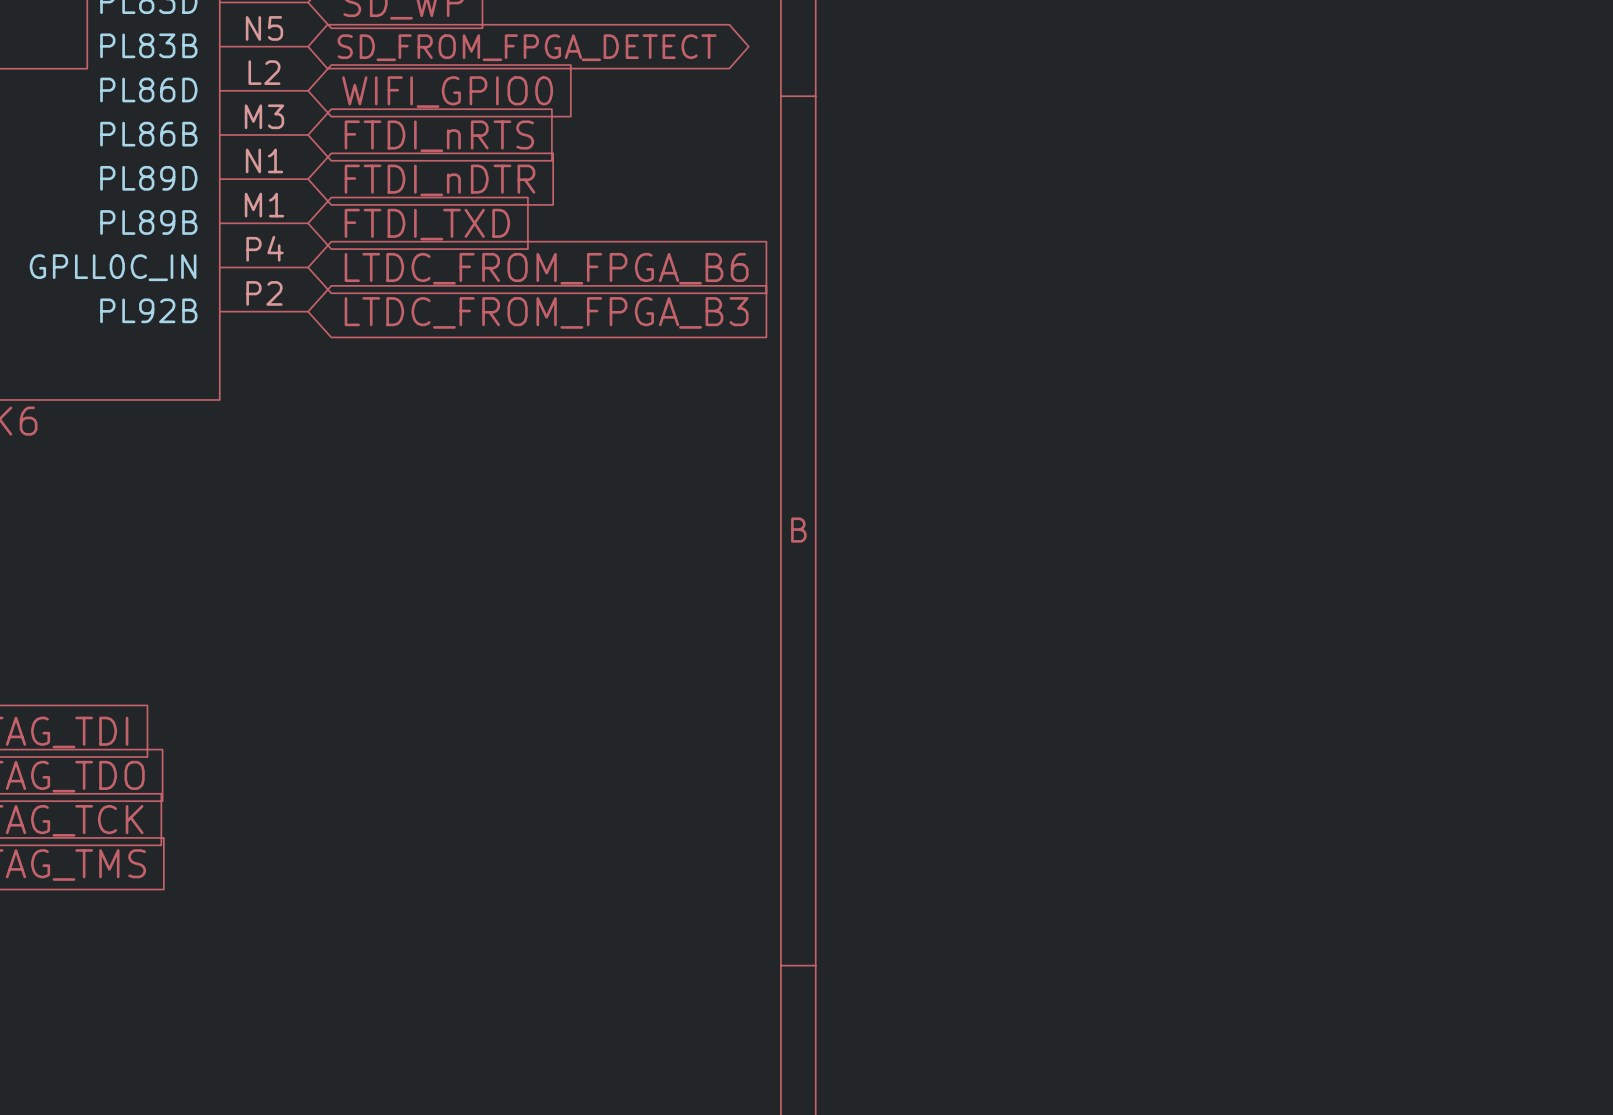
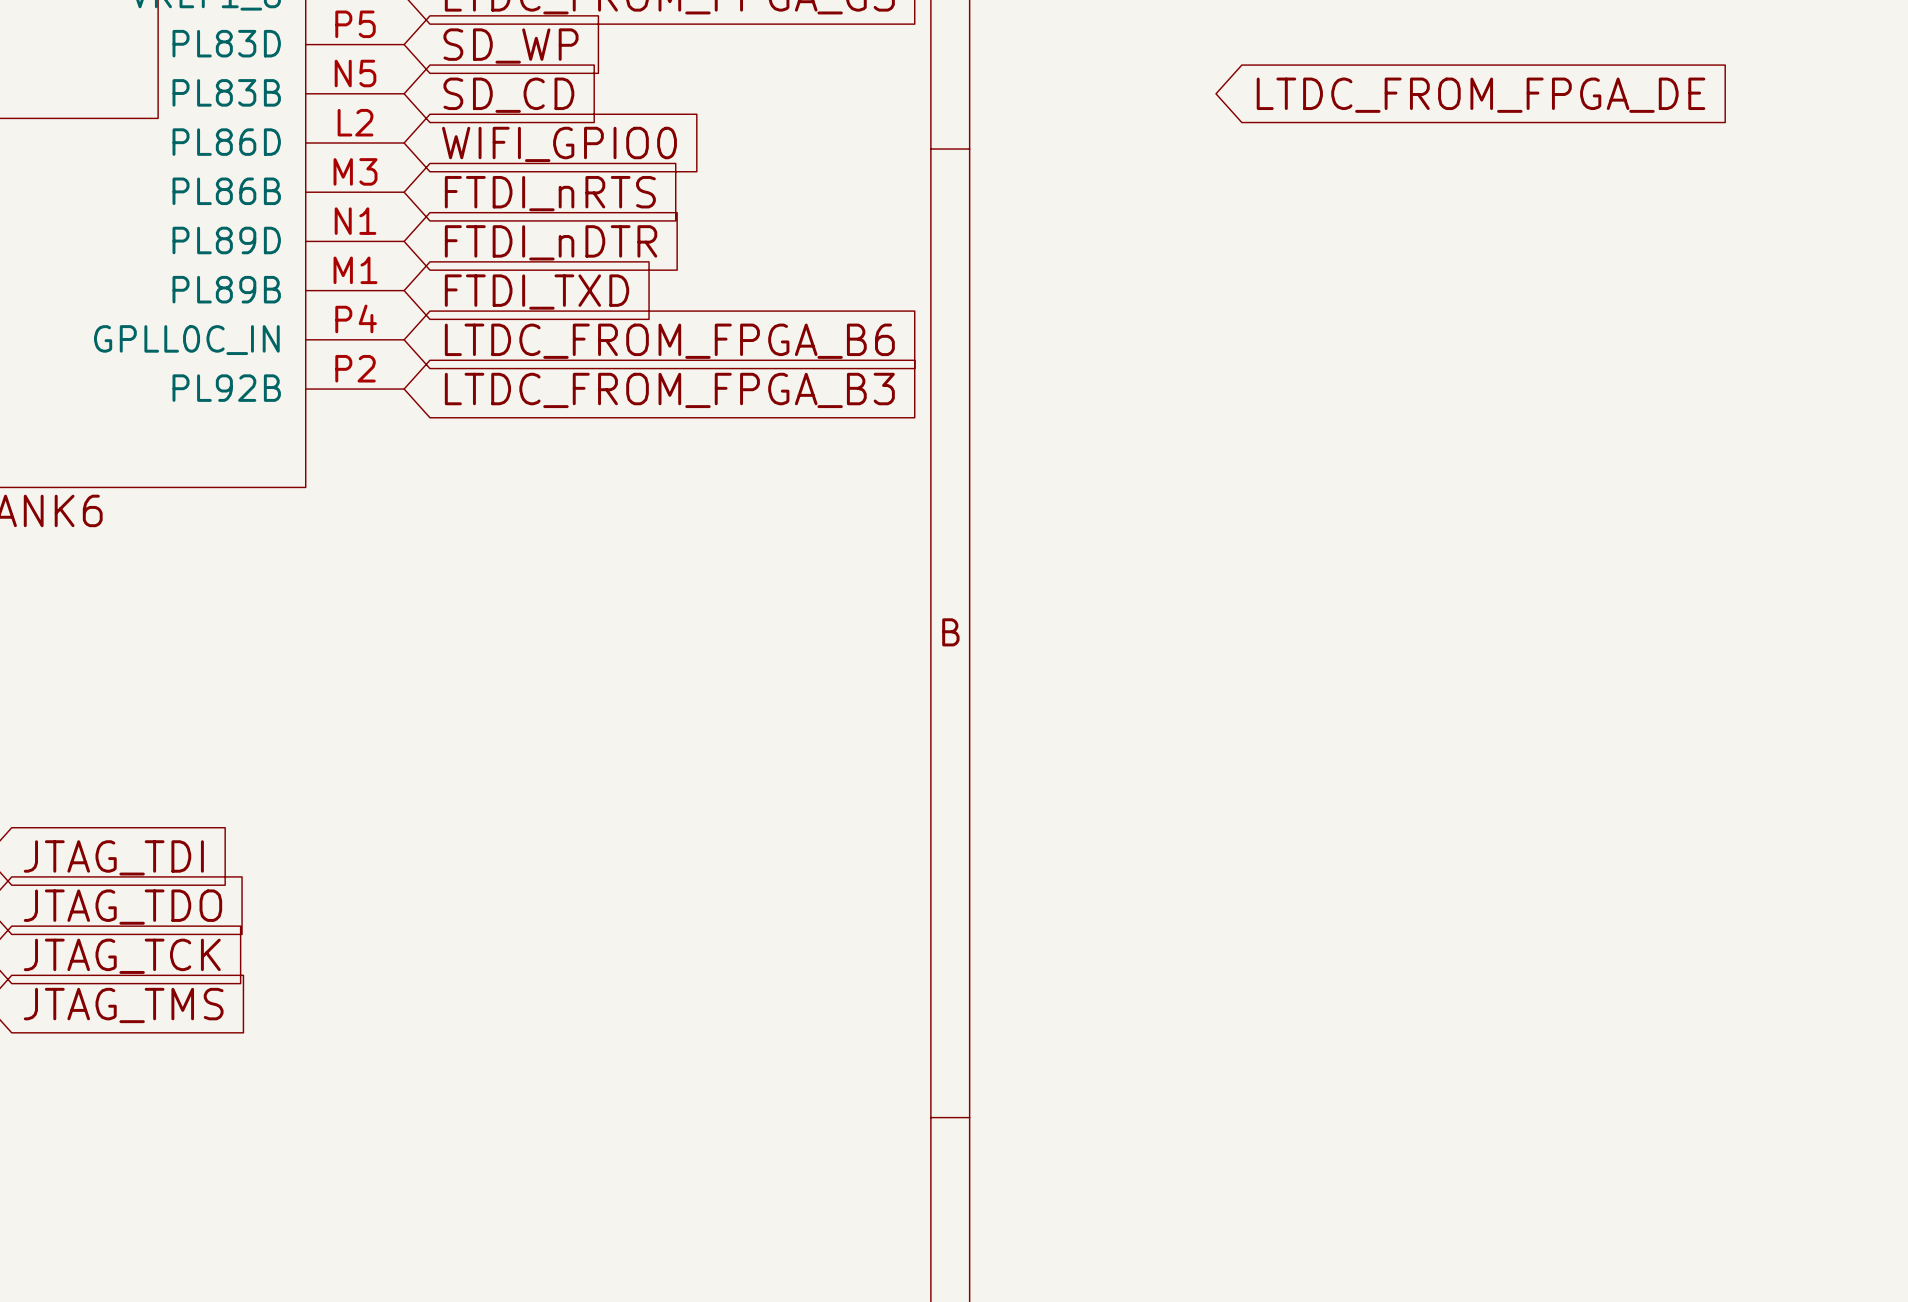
global label shape: bidirectional (527, 47) -> input (508, 95)
global label: SD_FROM_FPGA_DETECT (527, 47) -> SD_CD (508, 95)
global label: none -> LTDC_FROM_FPGA_DE (1481, 95)

